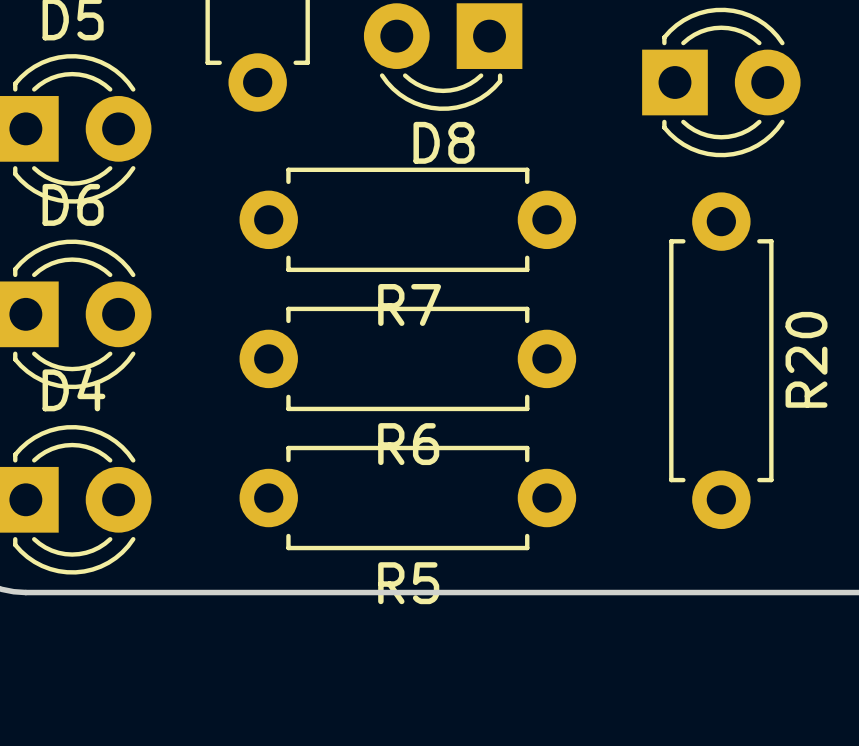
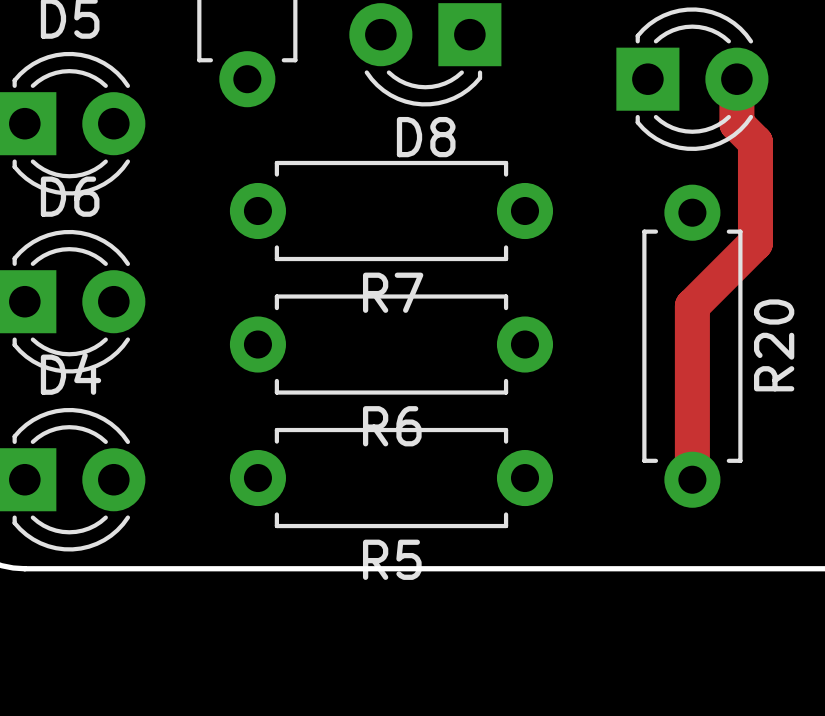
track: none -> (736, 79) (736, 123) (755, 142) (755, 242) (692, 306) (692, 479)

